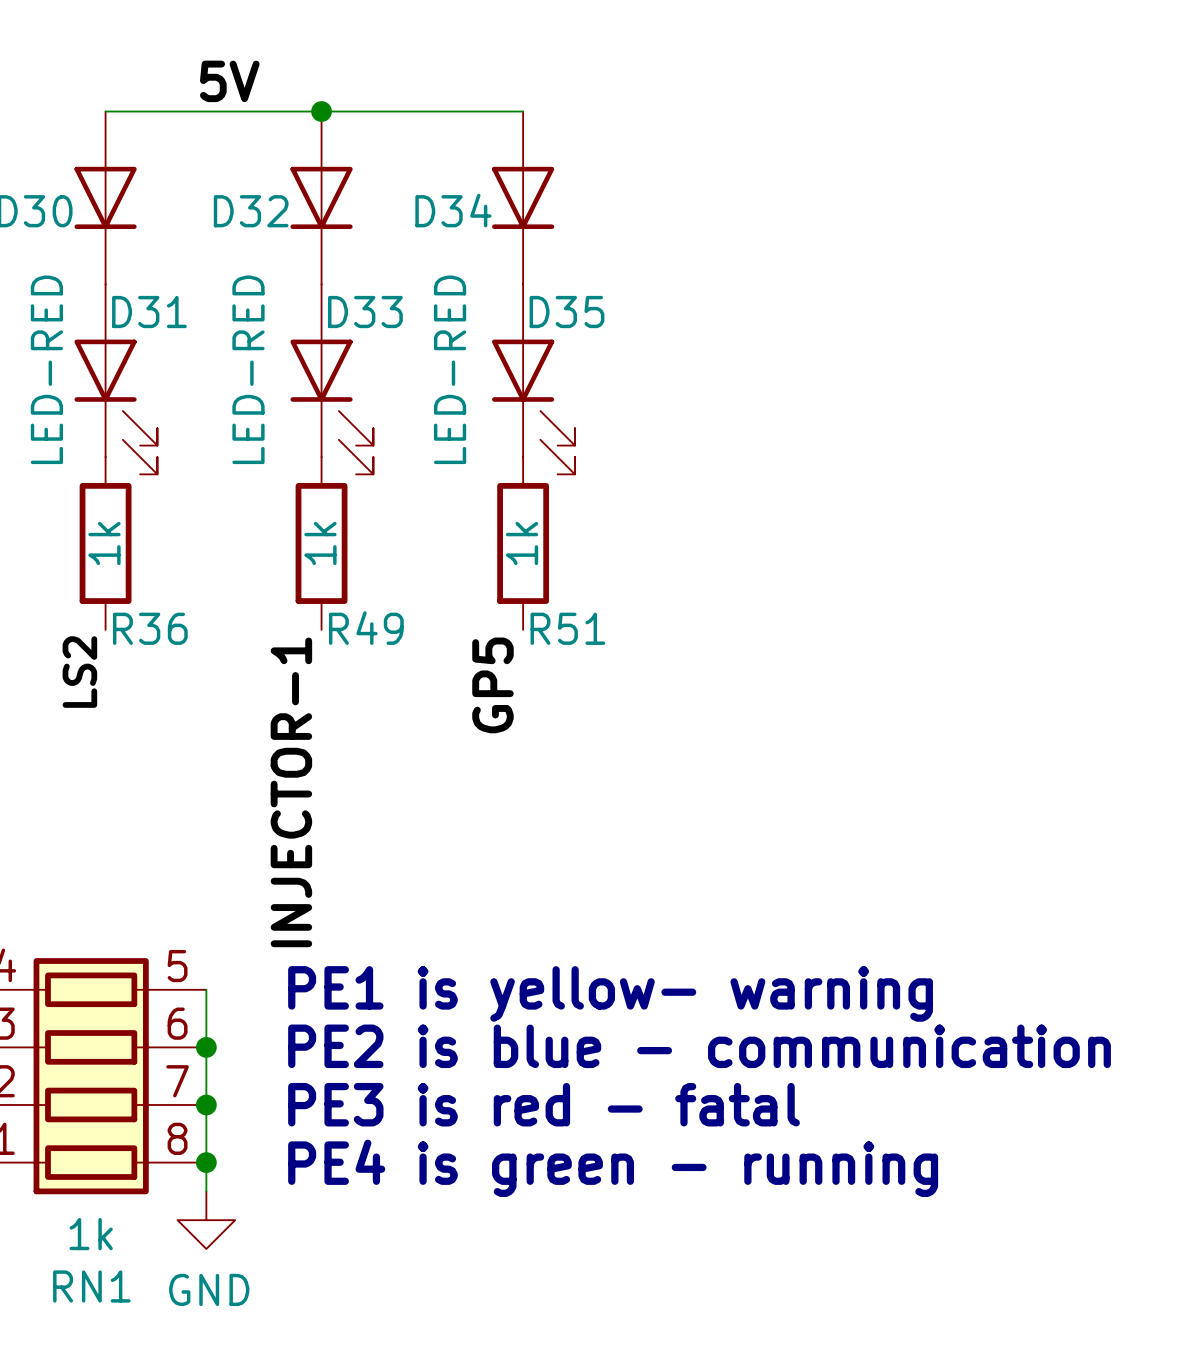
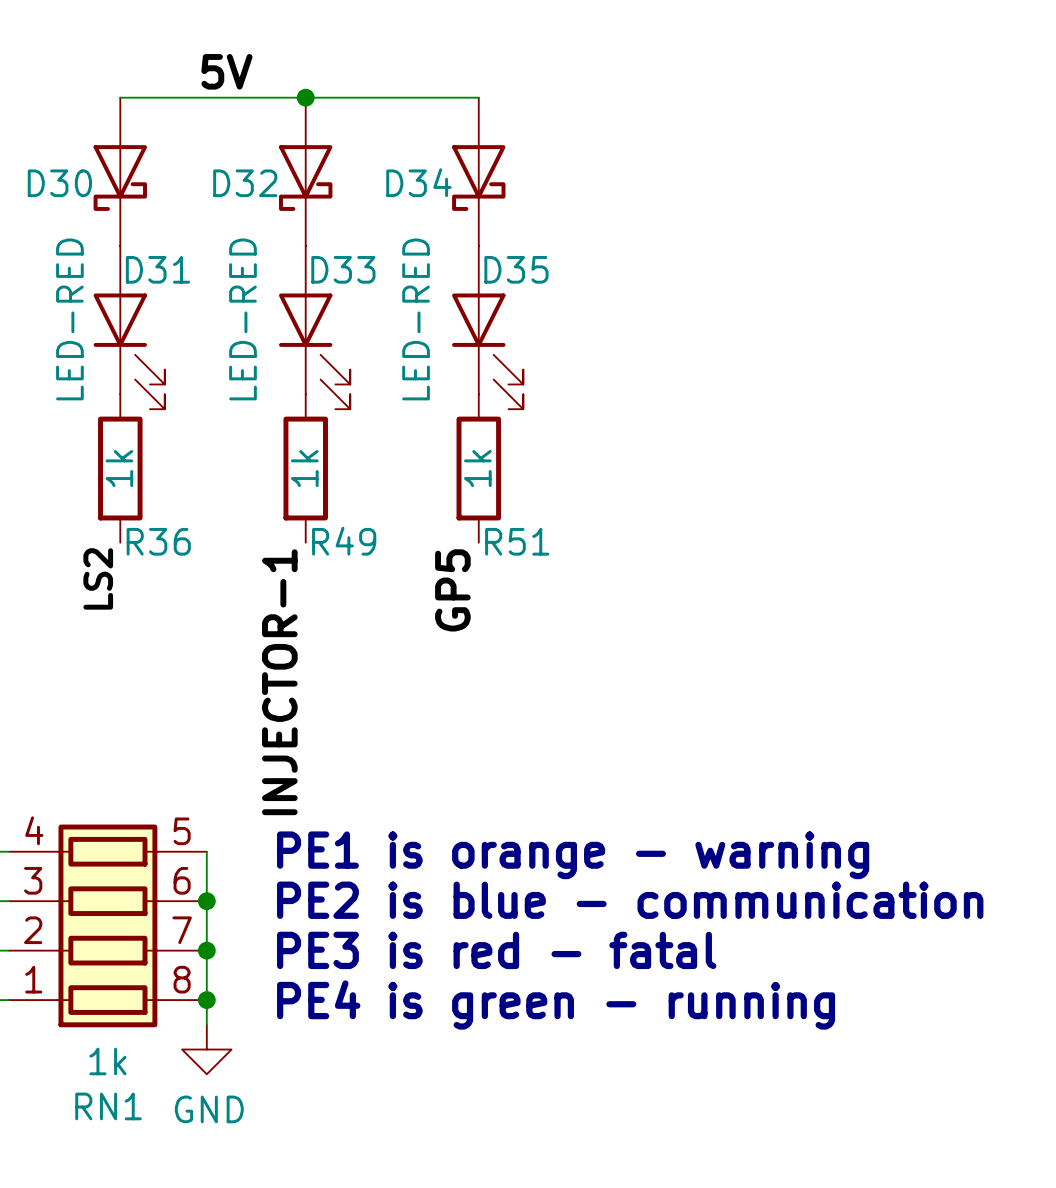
D30 symbol: [74, 111, 137, 285] -> [93, 97, 147, 247]
D32 symbol: [290, 111, 353, 285] -> [279, 97, 333, 247]
D34 symbol: [492, 111, 555, 285] -> [452, 97, 506, 247]
text: PE1 is yellow- warning (610, 993) -> PE1 is orange - warning (573, 855)

